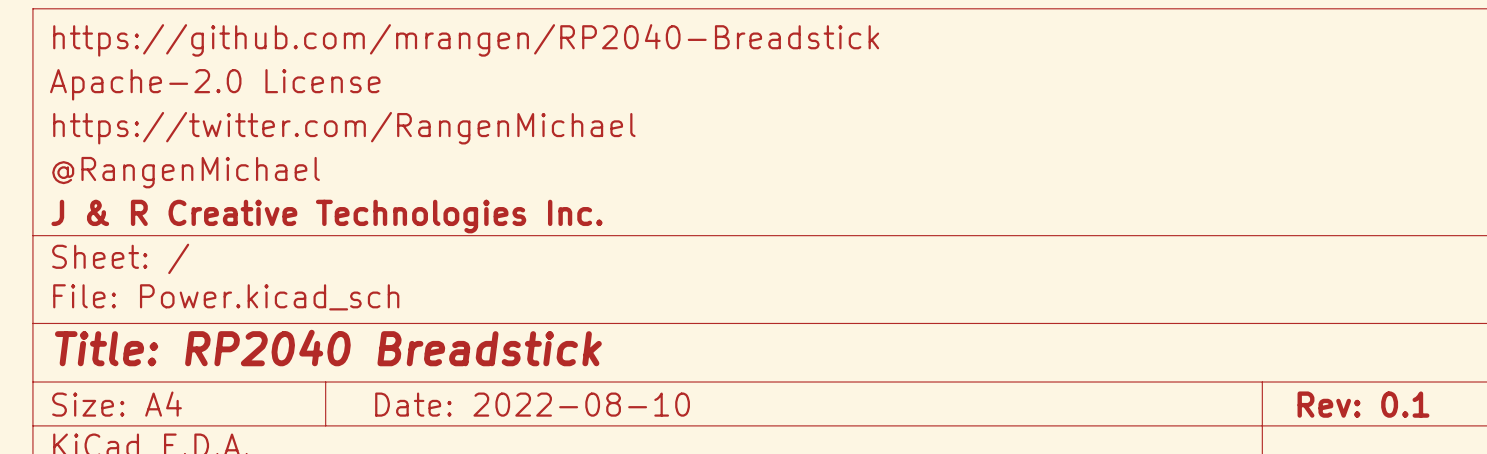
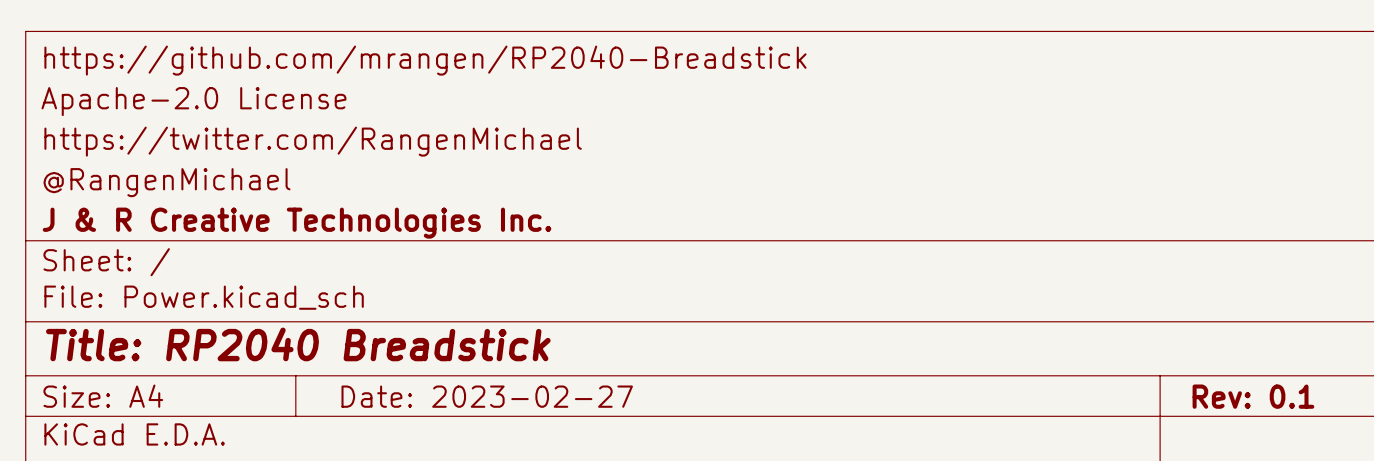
title block: Date: 2022-08-10 (532, 404) -> Date: 2023-02-27 (487, 396)

